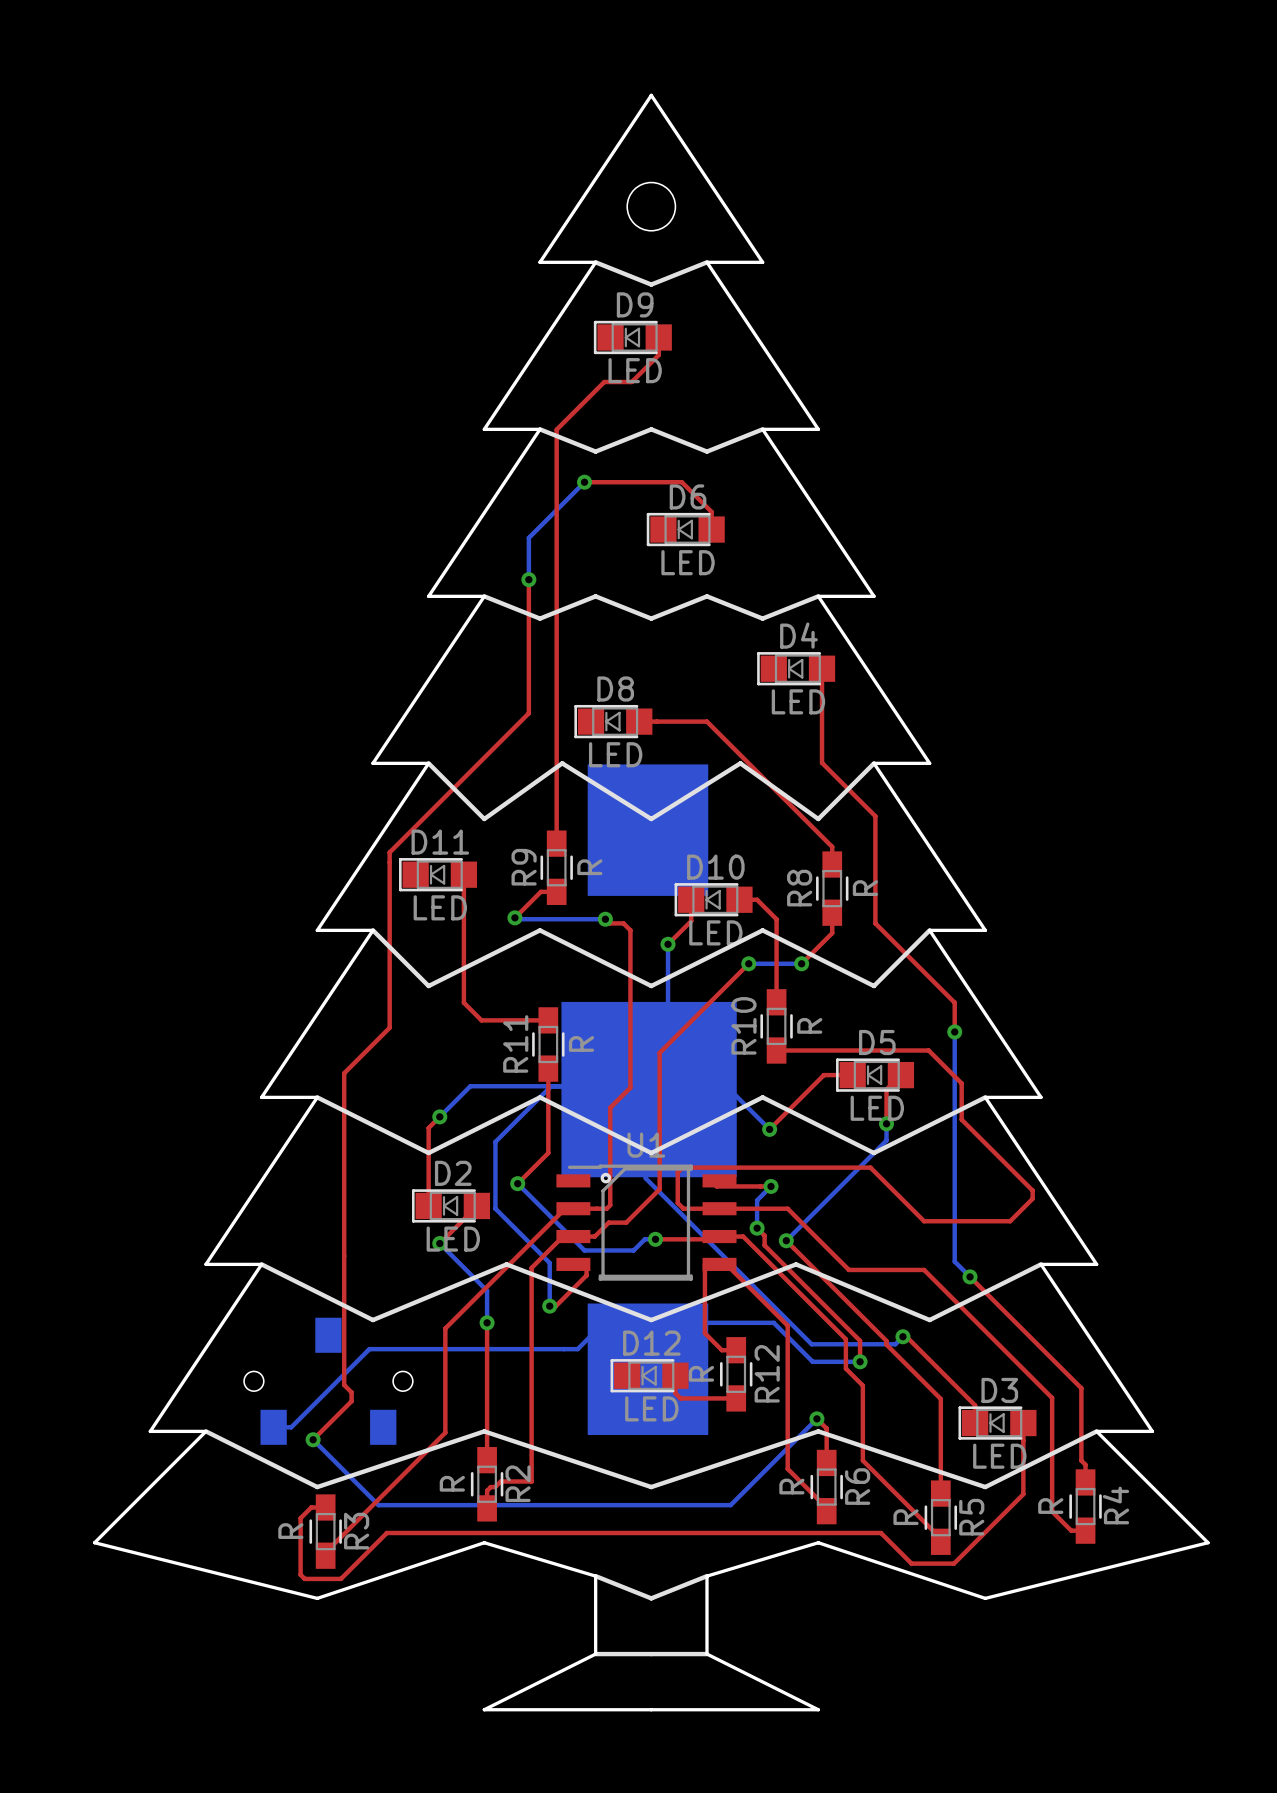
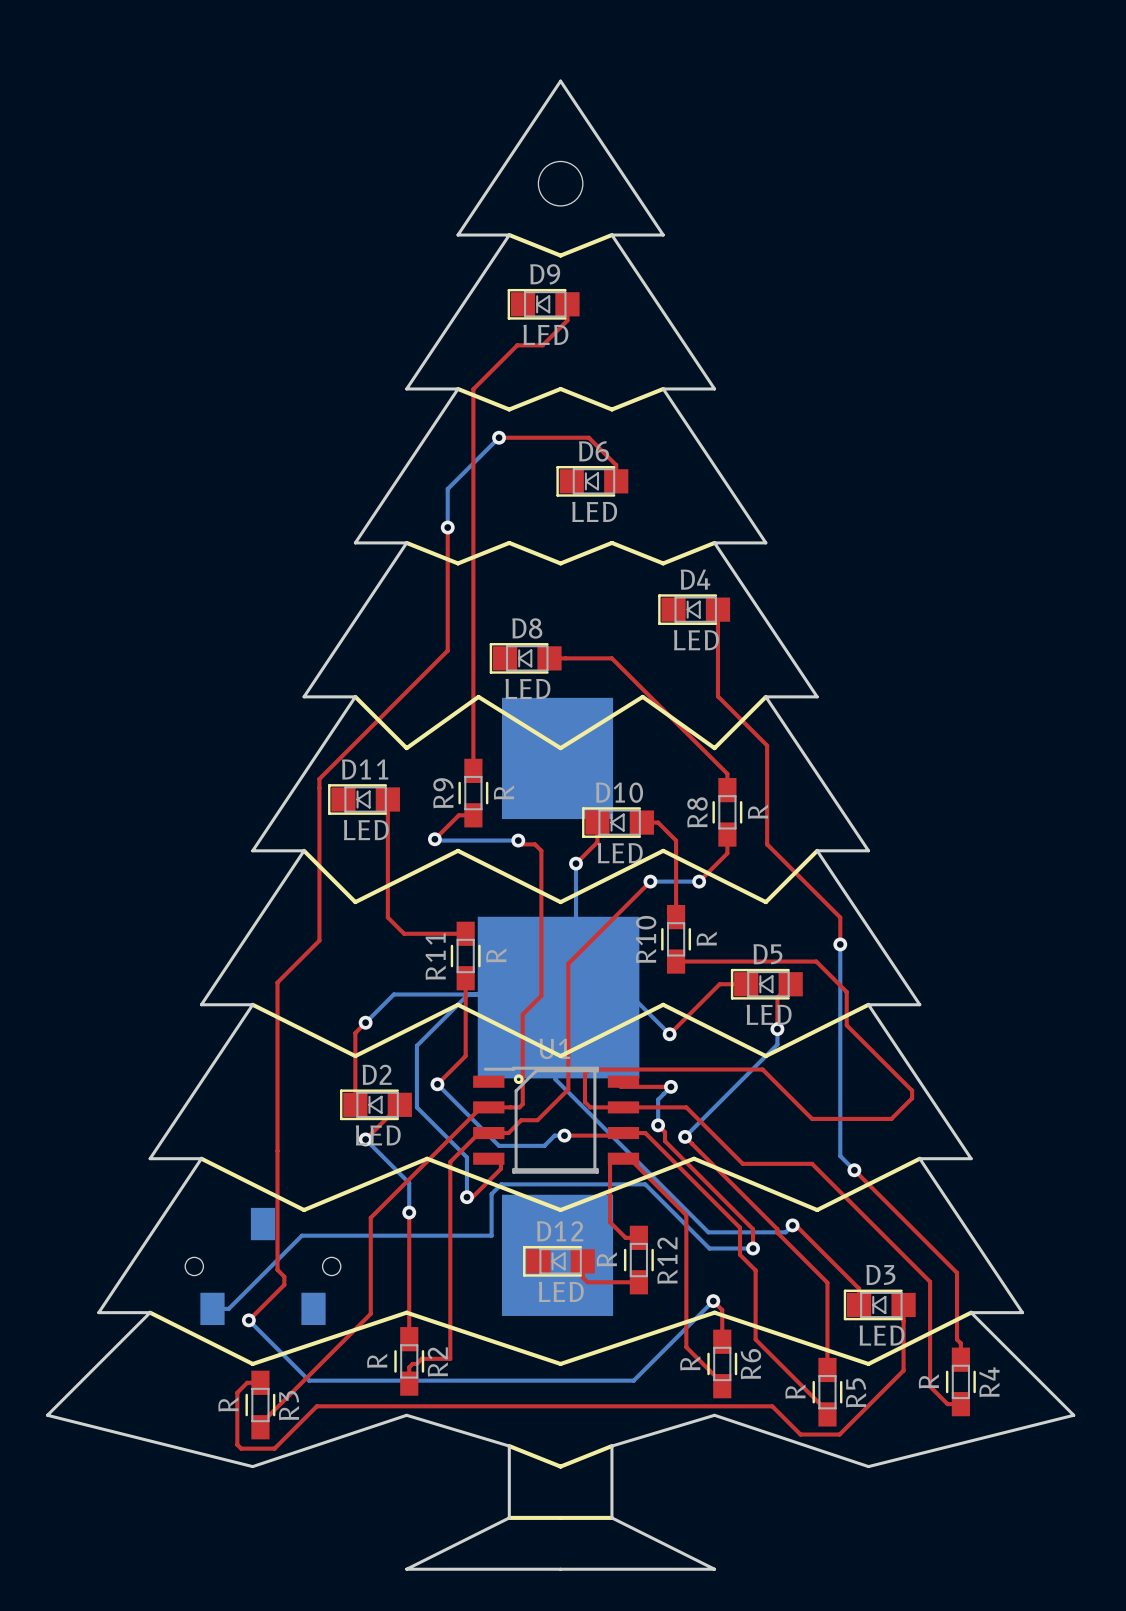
bottom track: (773, 1322) (604, 1322) (577, 1349) (369, 1349) -> (673, 1212) (645, 1184) (501, 1184) (491, 1194) (491, 1235) (300, 1236)

